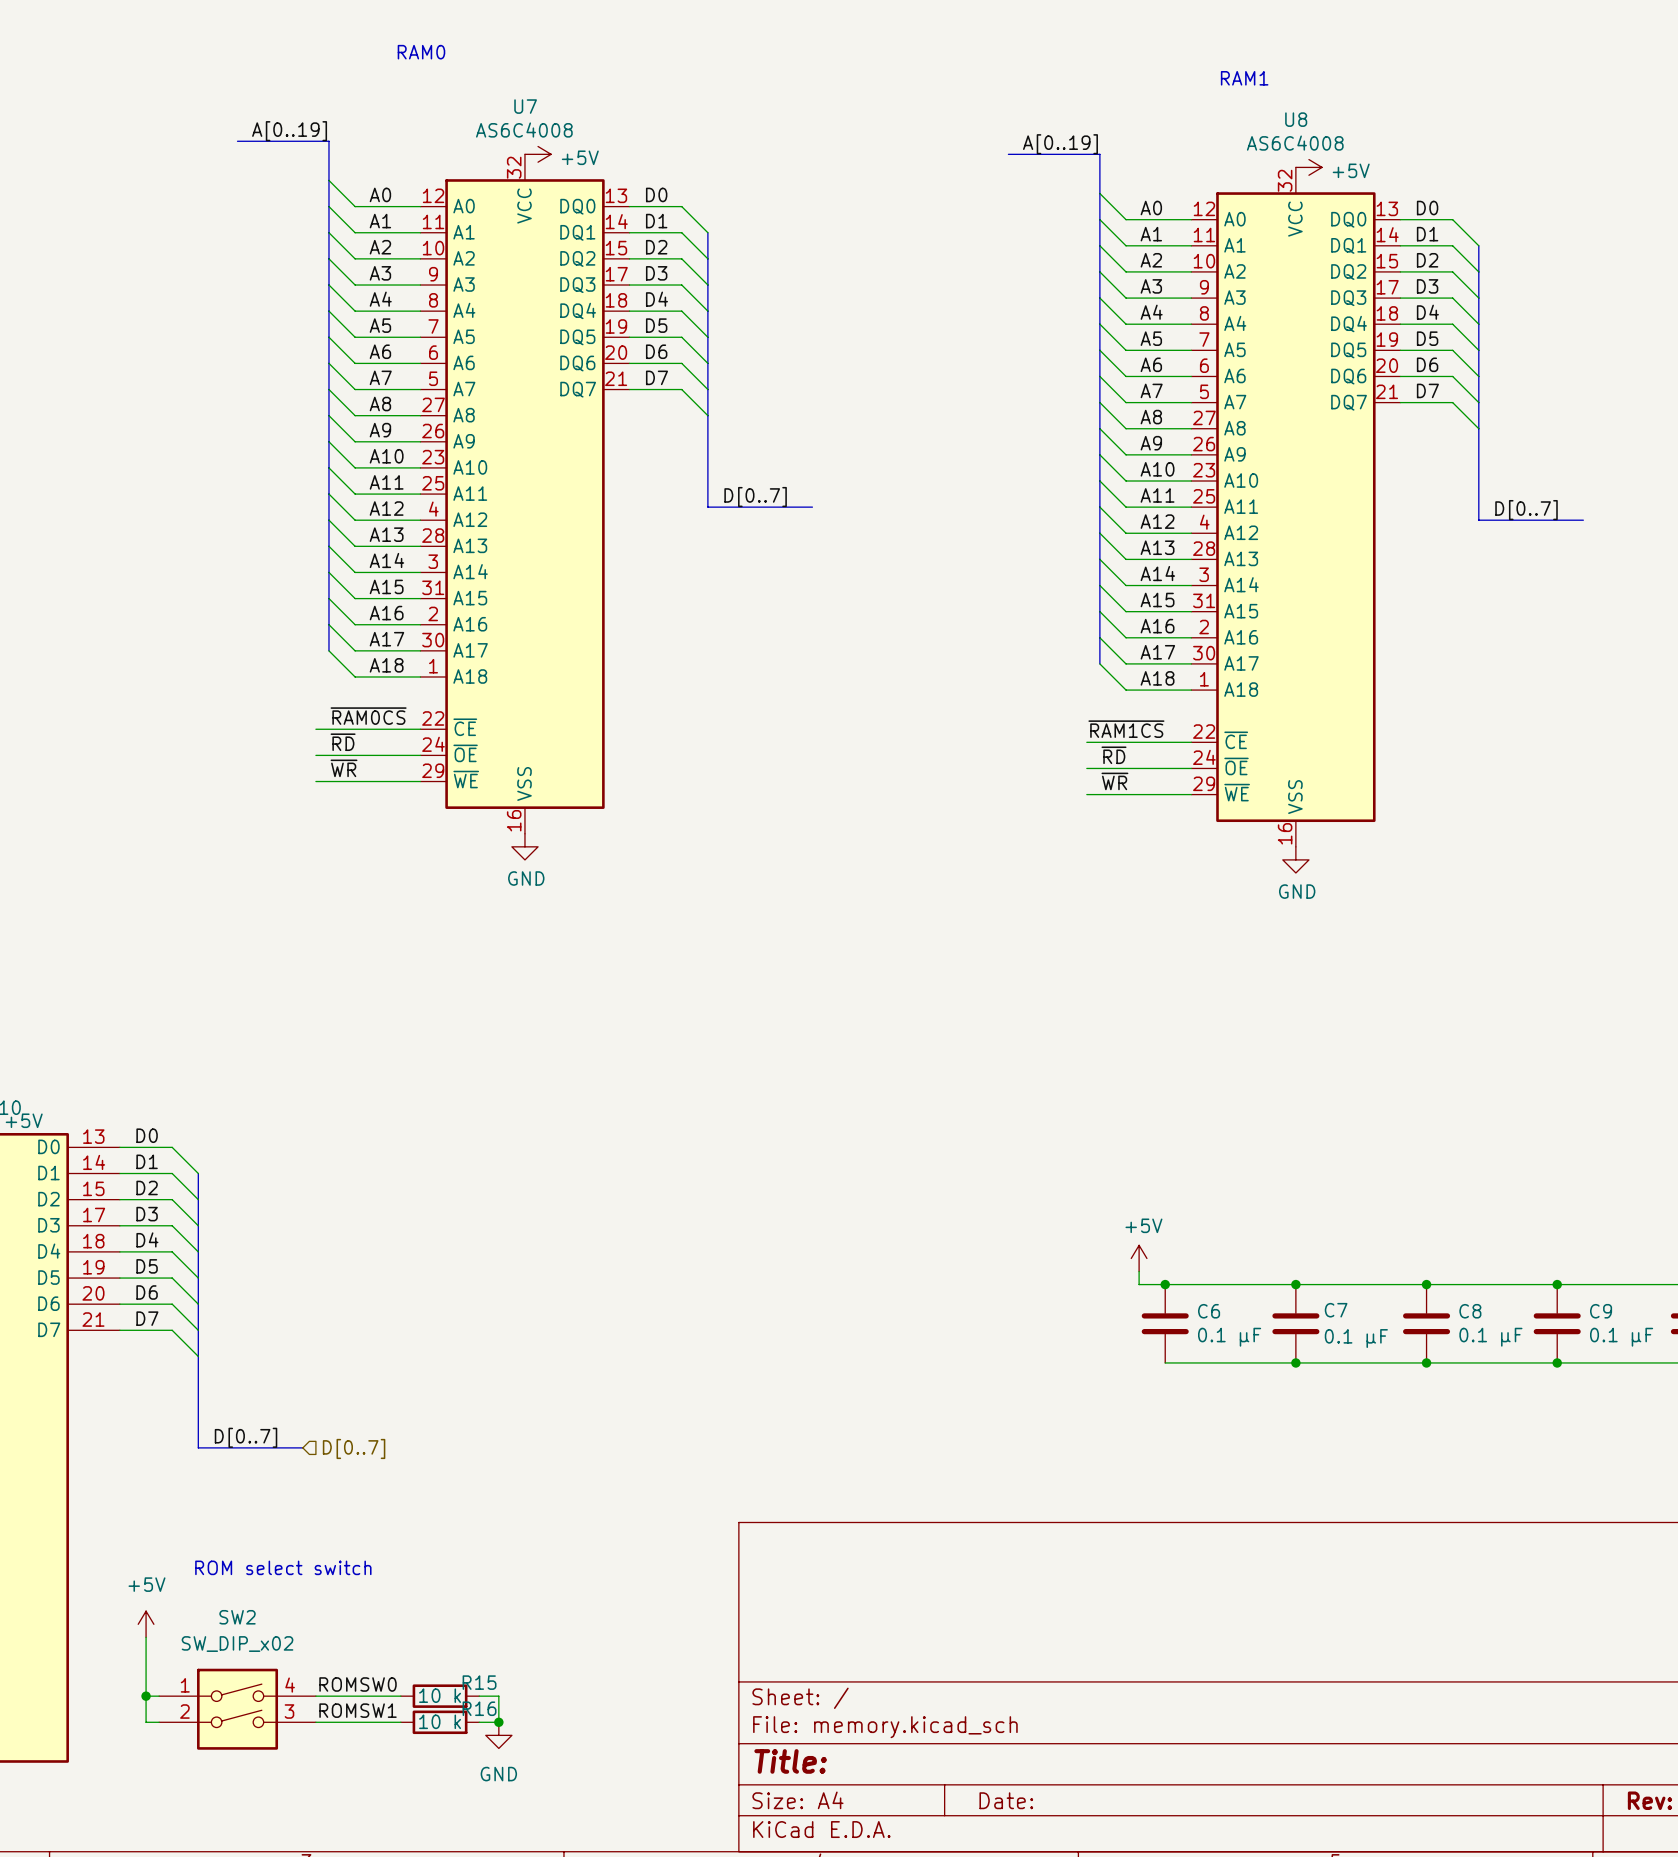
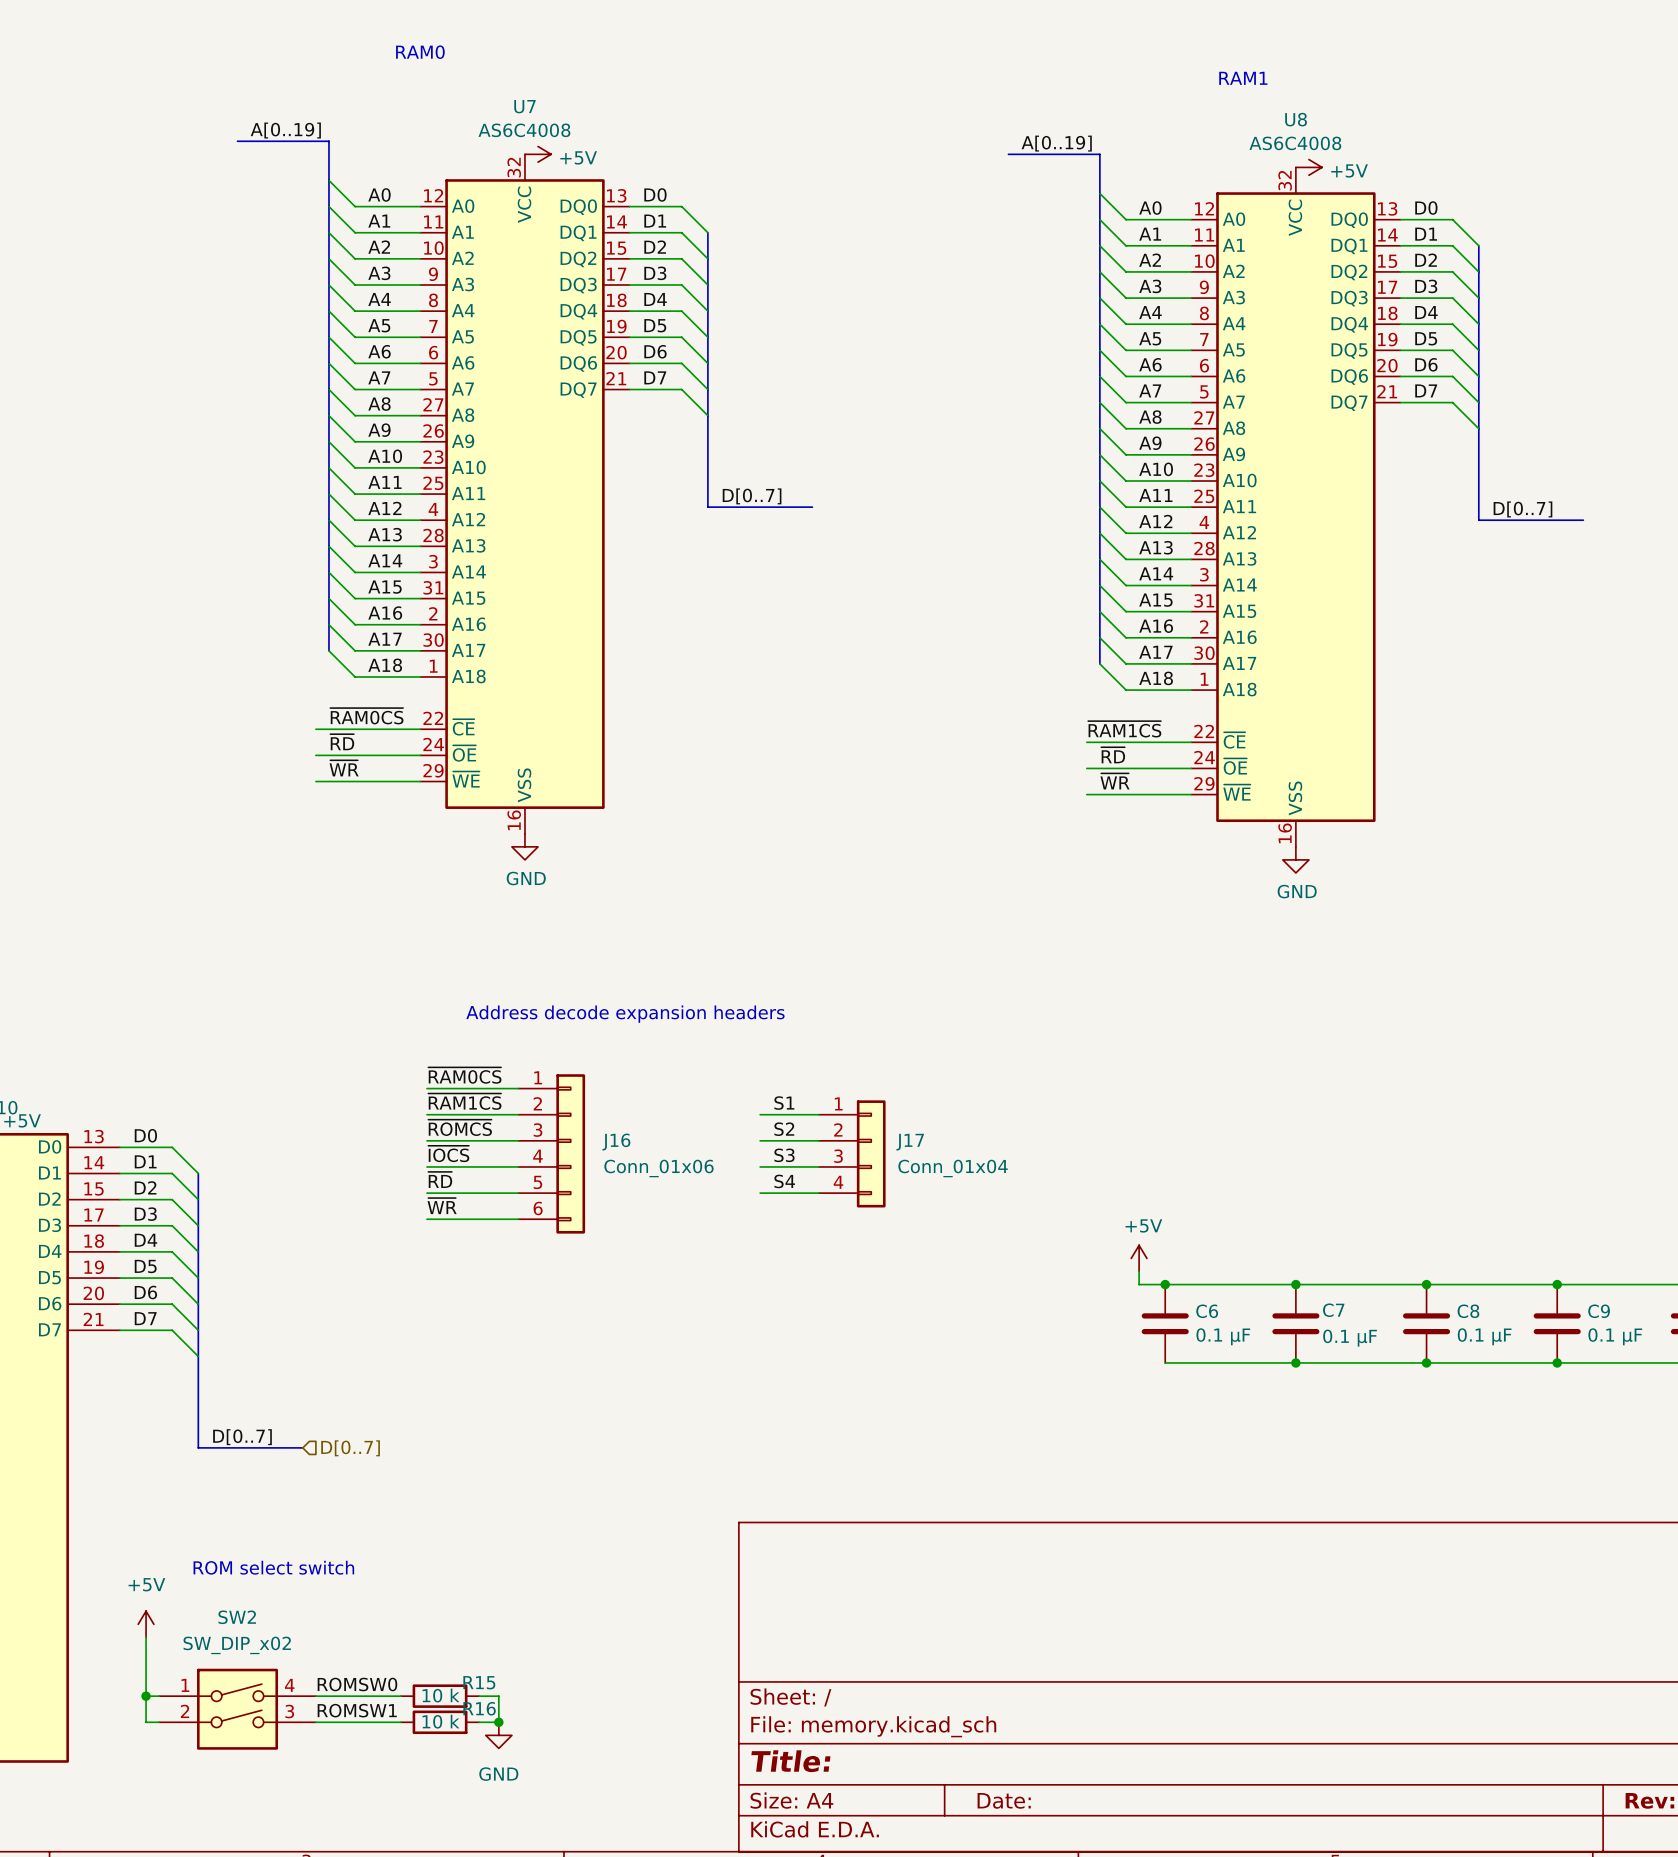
text: none -> Address decode expansion headers (625, 1014)
label: none -> ~{RAM0CS} (464, 1075)
wire: none -> (426, 1088) (518, 1088)
label: none -> ~{RAM1CS} (464, 1101)
label: none -> S1 (784, 1103)
wire: none -> (426, 1114) (518, 1114)
wire: none -> (760, 1114) (818, 1114)
label: none -> ~{ROMCS} (460, 1127)
label: none -> S2 (784, 1129)
wire: none -> (426, 1140) (518, 1140)
wire: none -> (760, 1140) (818, 1140)
label: none -> ~{IOCS} (448, 1153)
J16: none -> Conn_01x06 (551, 1153)
J17: none -> Conn_01x04 (852, 1153)
label: none -> S3 (784, 1155)
wire: none -> (426, 1166) (518, 1166)
wire: none -> (760, 1166) (818, 1166)
label: none -> ~{RD} (440, 1179)
label: none -> S4 (784, 1181)
wire: none -> (426, 1193) (518, 1193)
wire: none -> (760, 1193) (818, 1193)
label: none -> ~{WR} (442, 1206)
wire: none -> (426, 1219) (518, 1219)

